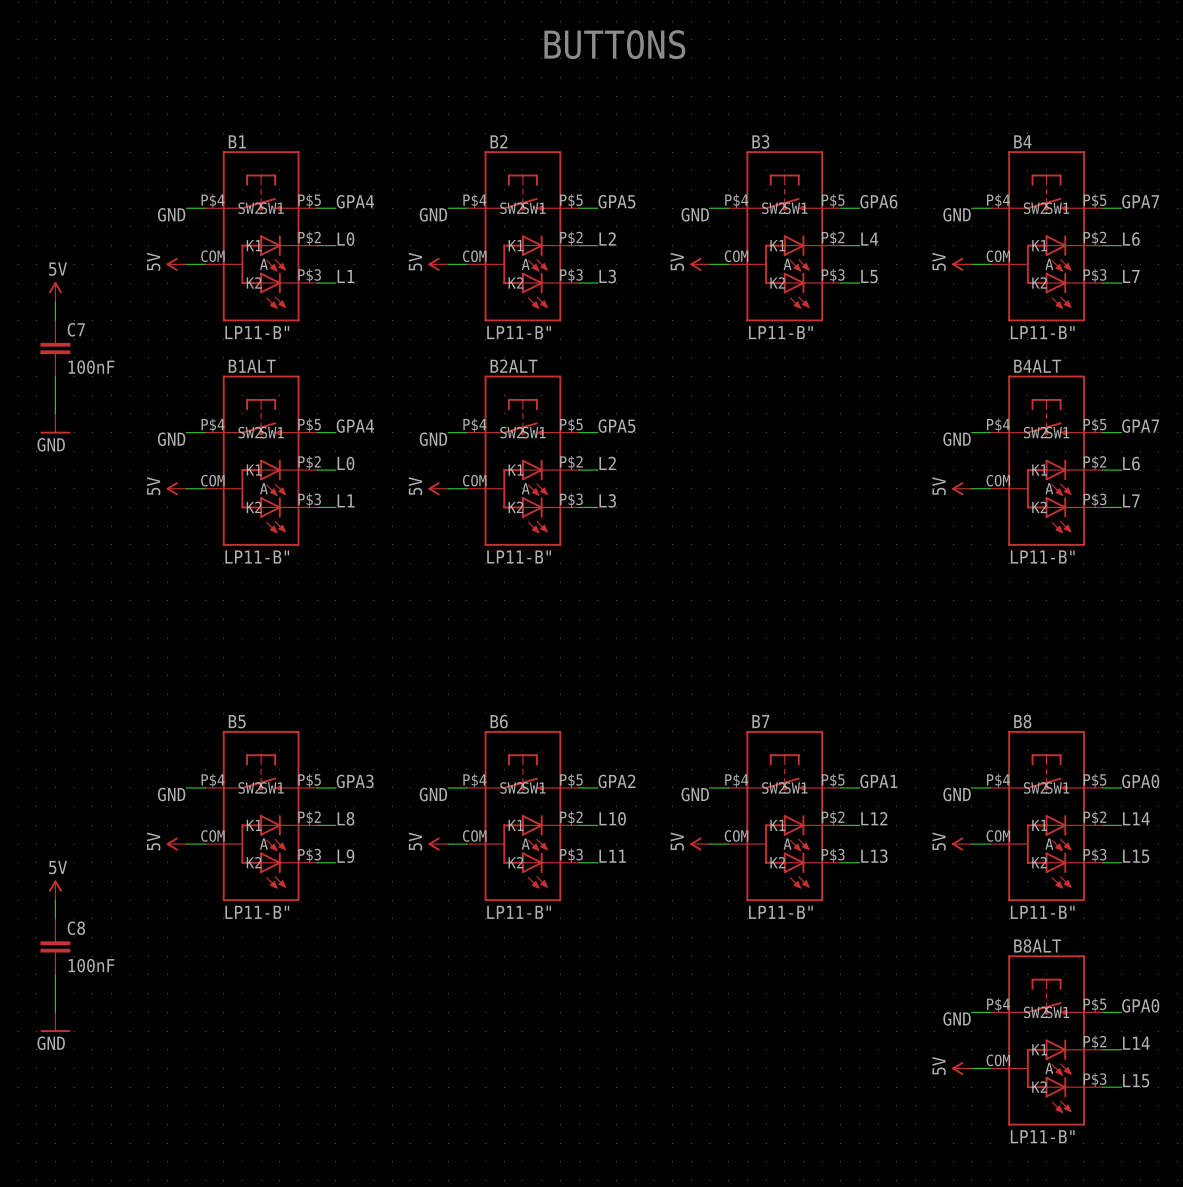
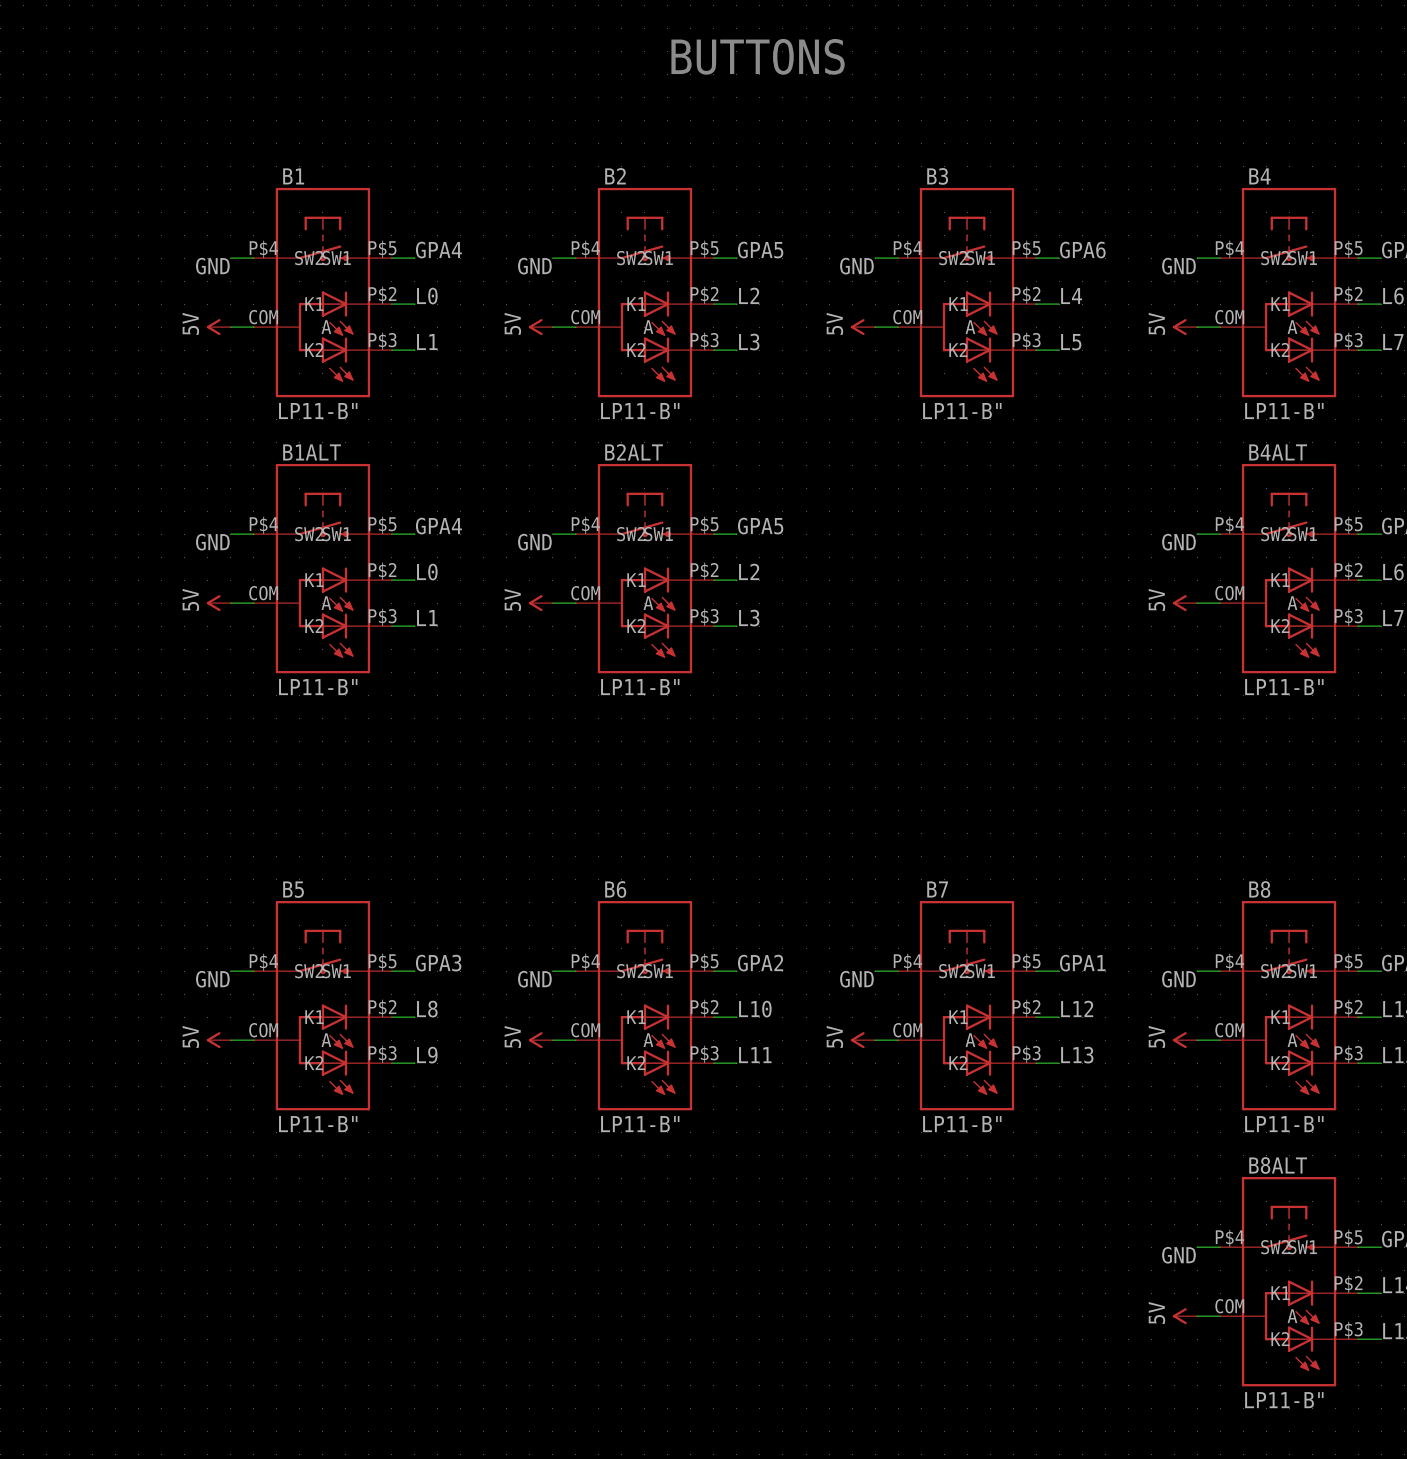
power symbol: 5V (55, 291) -> none
wire: (55, 301) (55, 320) -> none
C7: 100nF (55, 348) -> none
wire: (55, 376) (55, 413) -> none
power symbol: GND (55, 423) -> none
power symbol: 5V (55, 890) -> none
wire: (55, 900) (55, 918) -> none
C8: 100nF (55, 946) -> none
wire: (55, 974) (55, 1012) -> none
power symbol: GND (55, 1022) -> none

